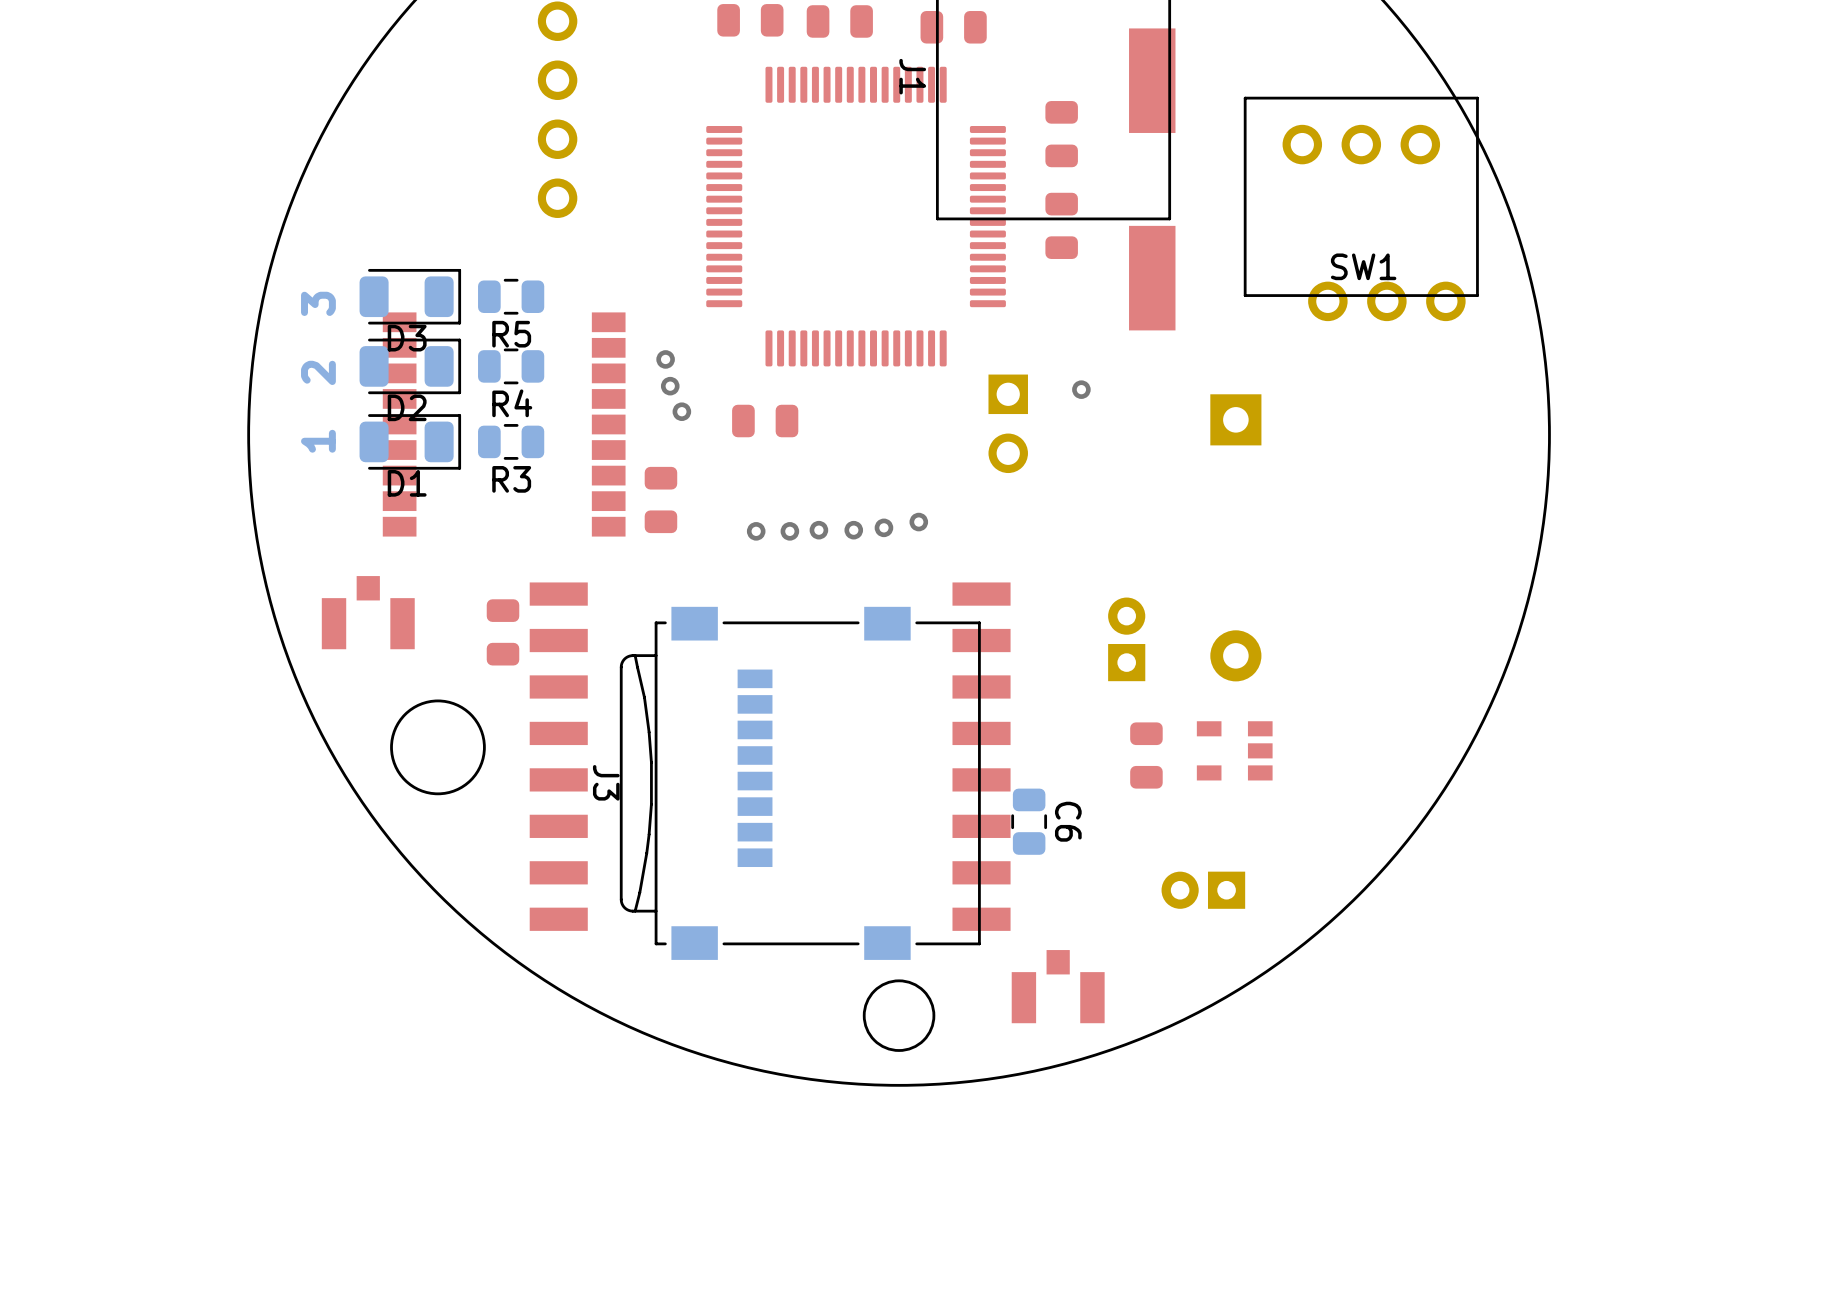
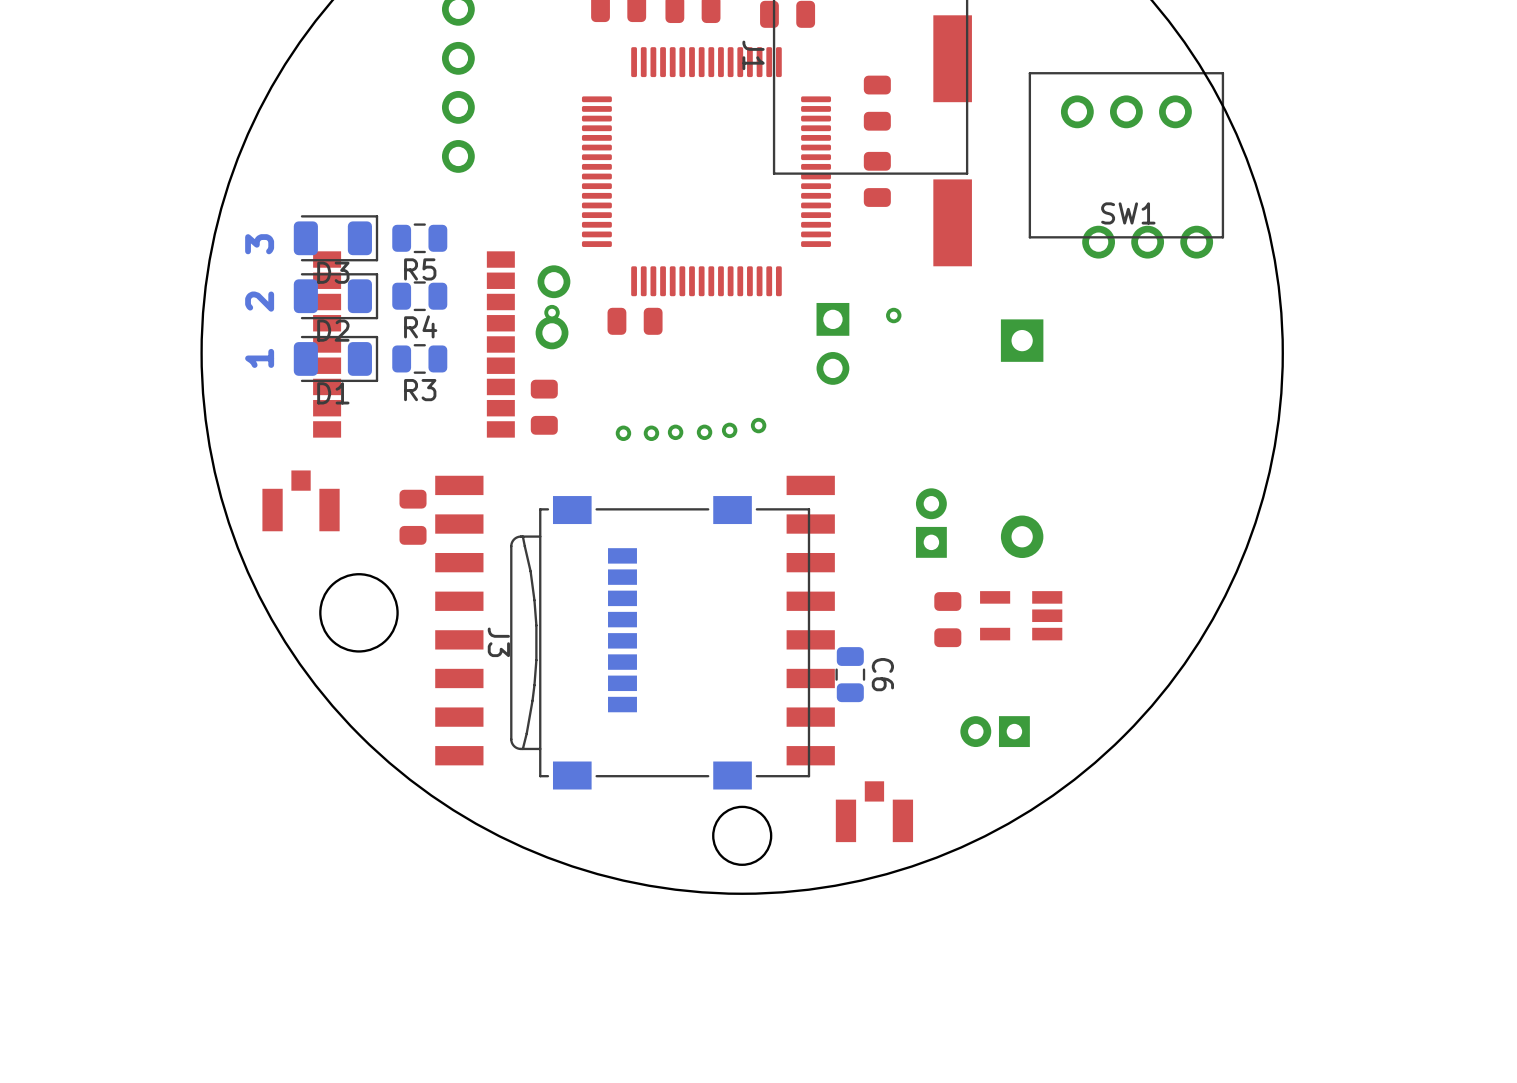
via size: [656, 350, 675, 369] -> [537, 265, 571, 299]
via size: [672, 402, 692, 422] -> [535, 316, 569, 350]
part position: (765, 421) -> (635, 321)
part footprint: [1196, 721, 1273, 781] -> [980, 591, 1063, 641]

